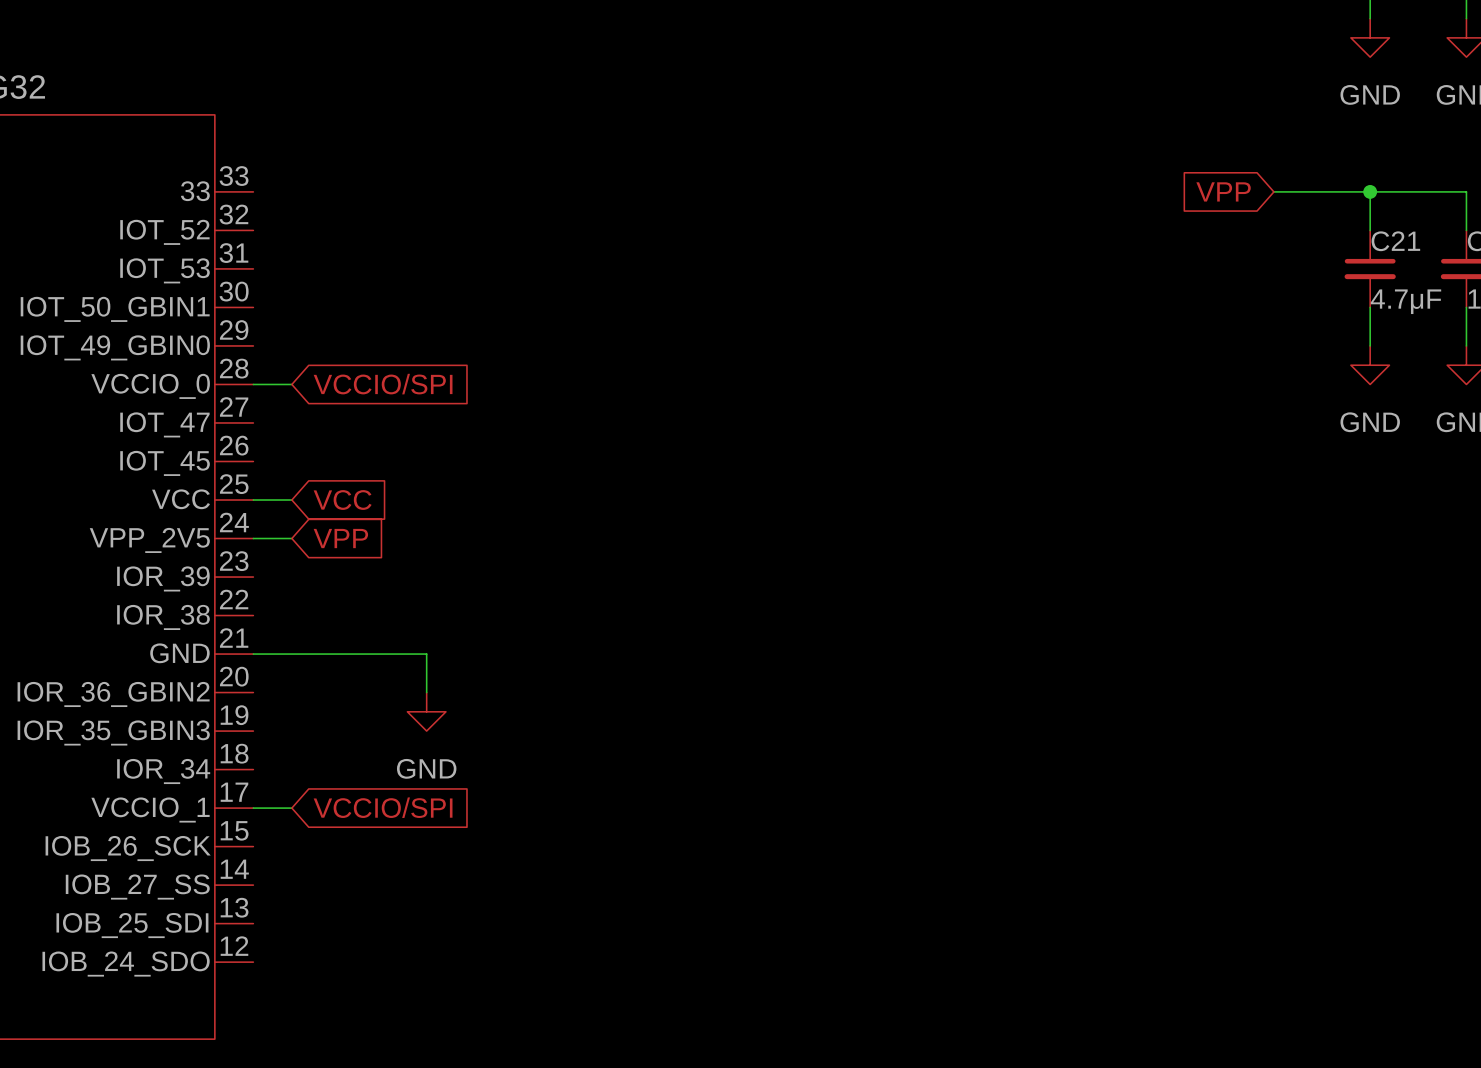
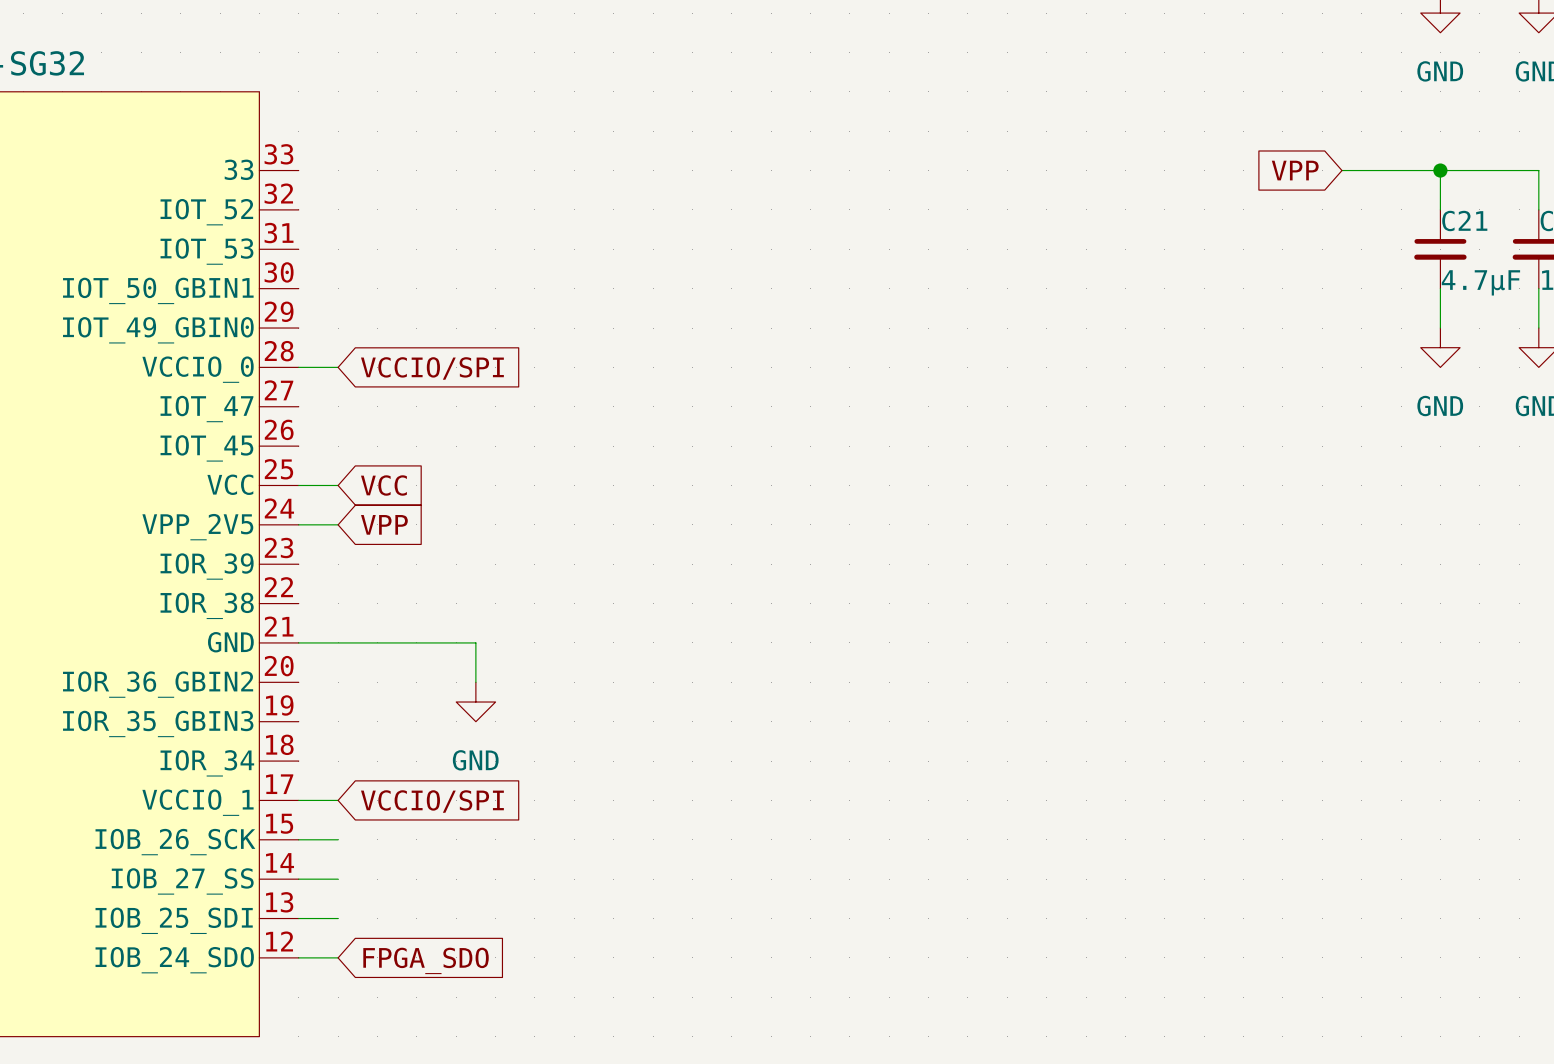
wire: none -> (298, 839) (338, 839)
wire: none -> (298, 879) (338, 879)
wire: none -> (298, 918) (338, 918)
wire: none -> (298, 957) (338, 957)
global label: none -> FPGA_SDO (426, 960)

